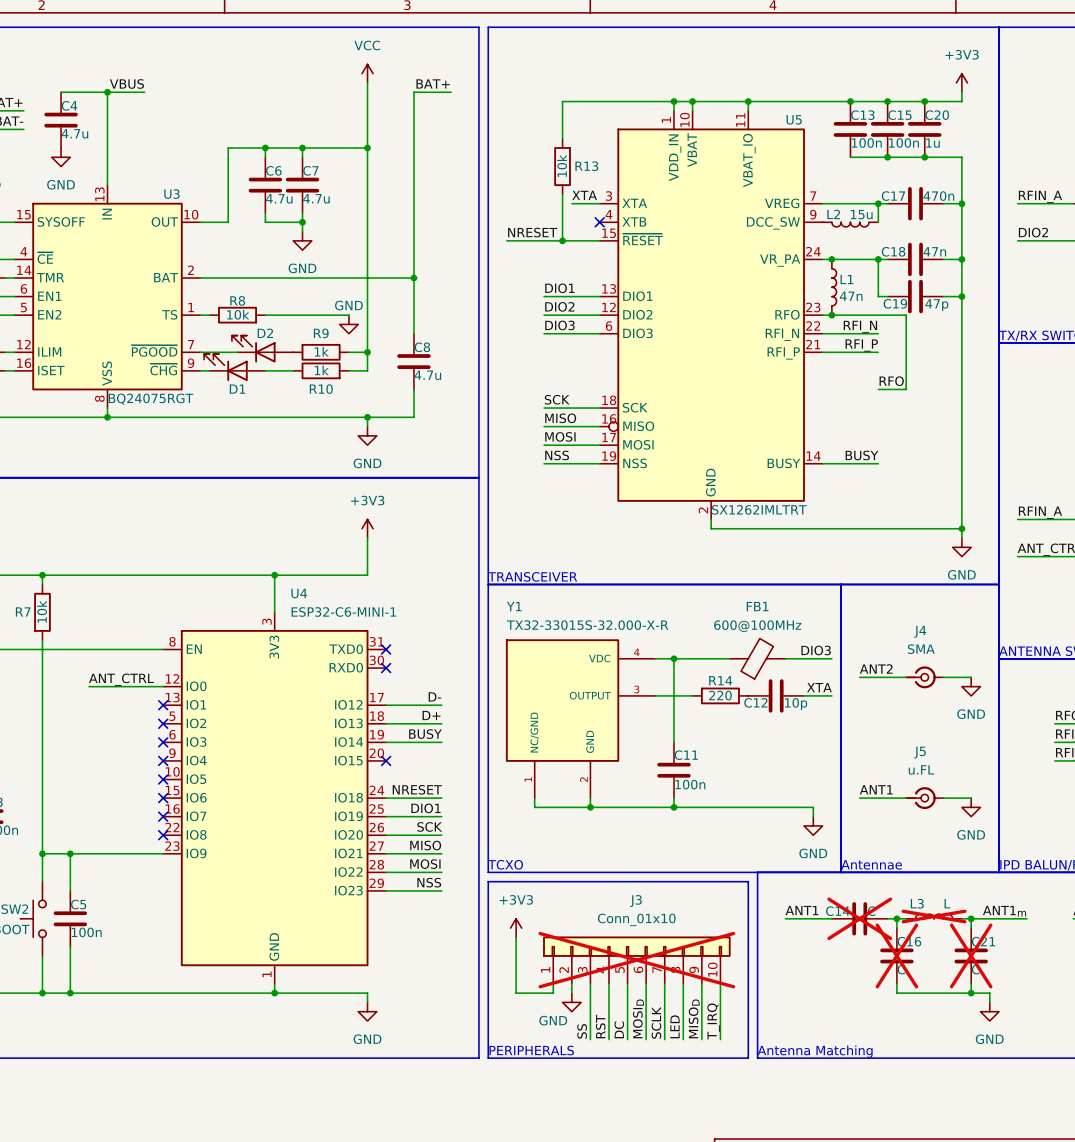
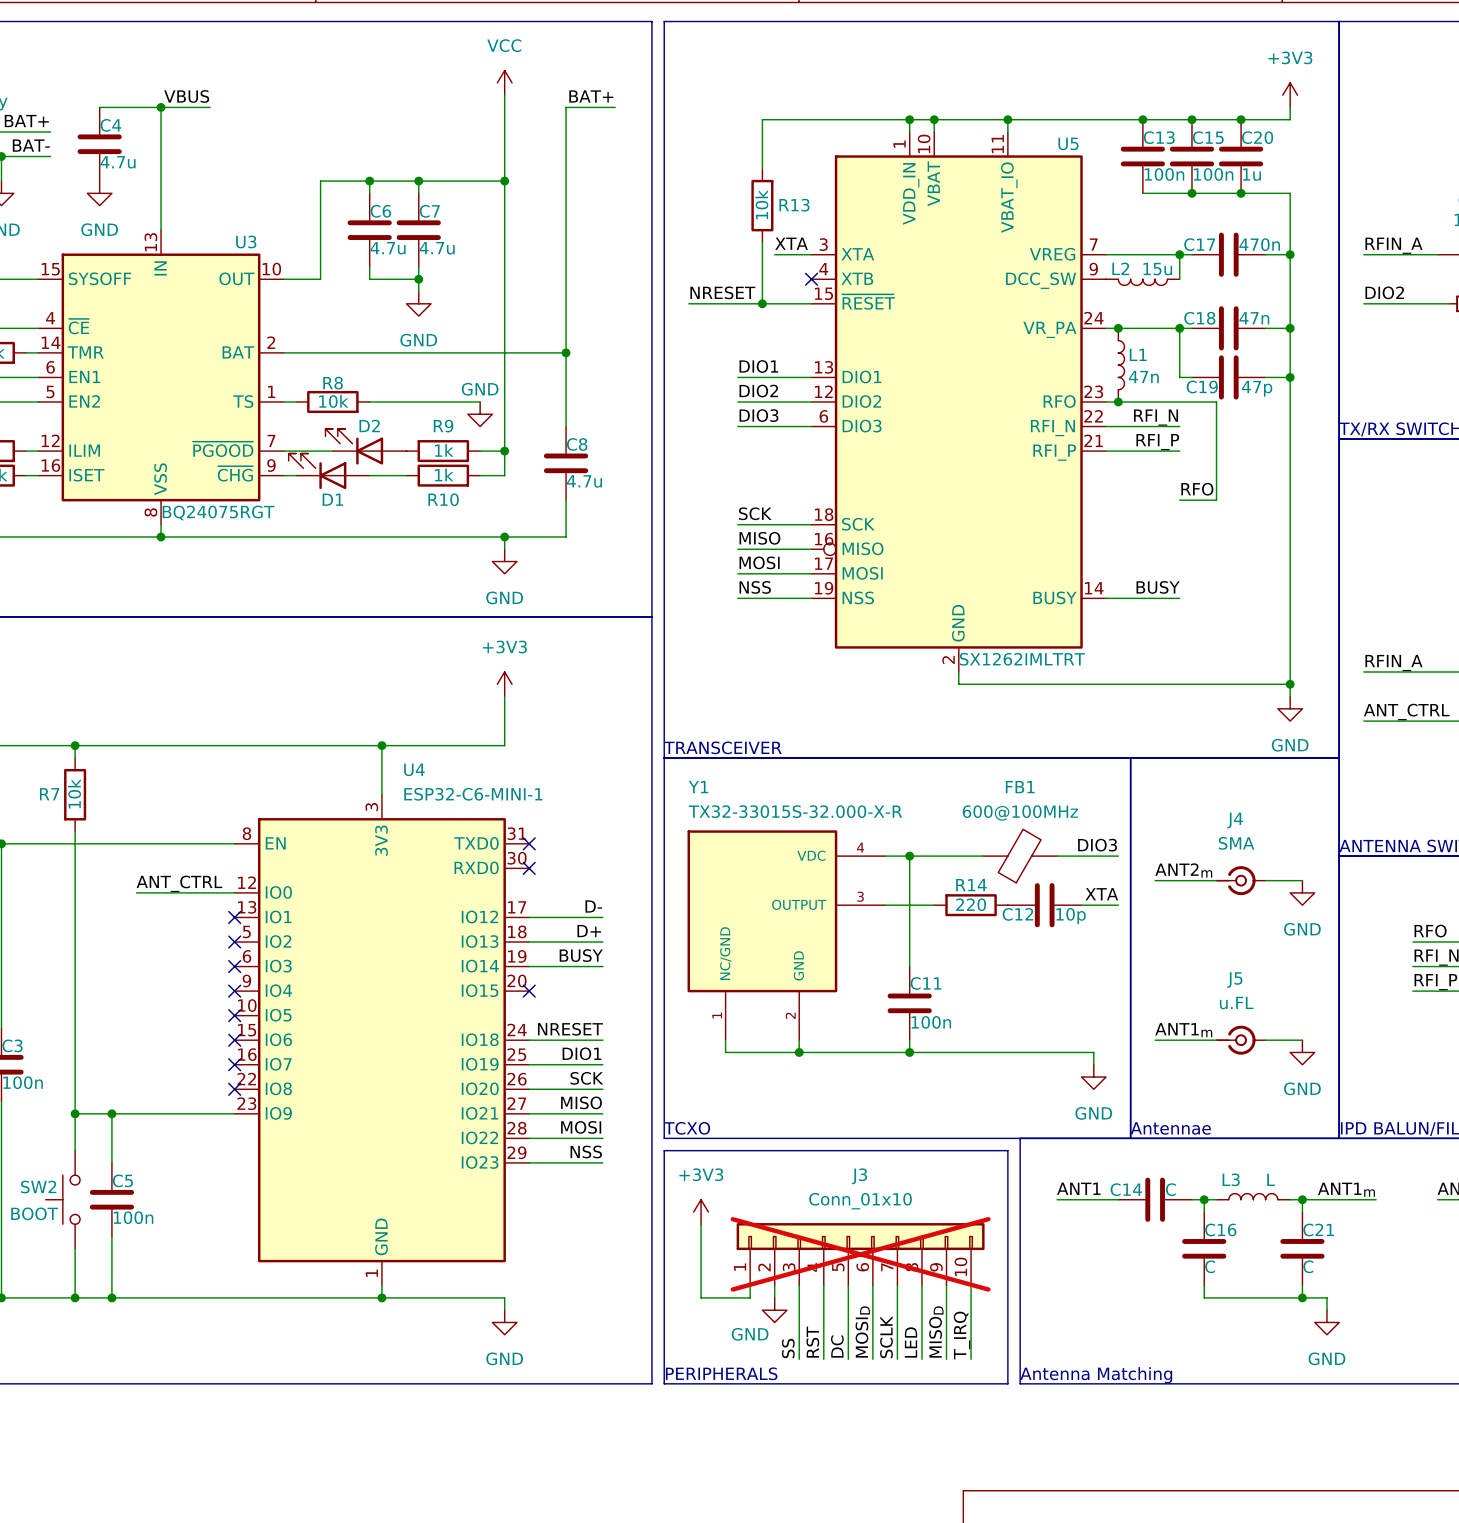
label: ANT2 (876, 668) -> ANT2m (1183, 870)
label: ANT1 (876, 789) -> ANT1m (1183, 1030)
L3 do-not-place cross: (934, 916) -> none
C14 do-not-place cross: (859, 918) -> none
C16 do-not-place cross: (896, 955) -> none
C21 do-not-place cross: (971, 955) -> none

